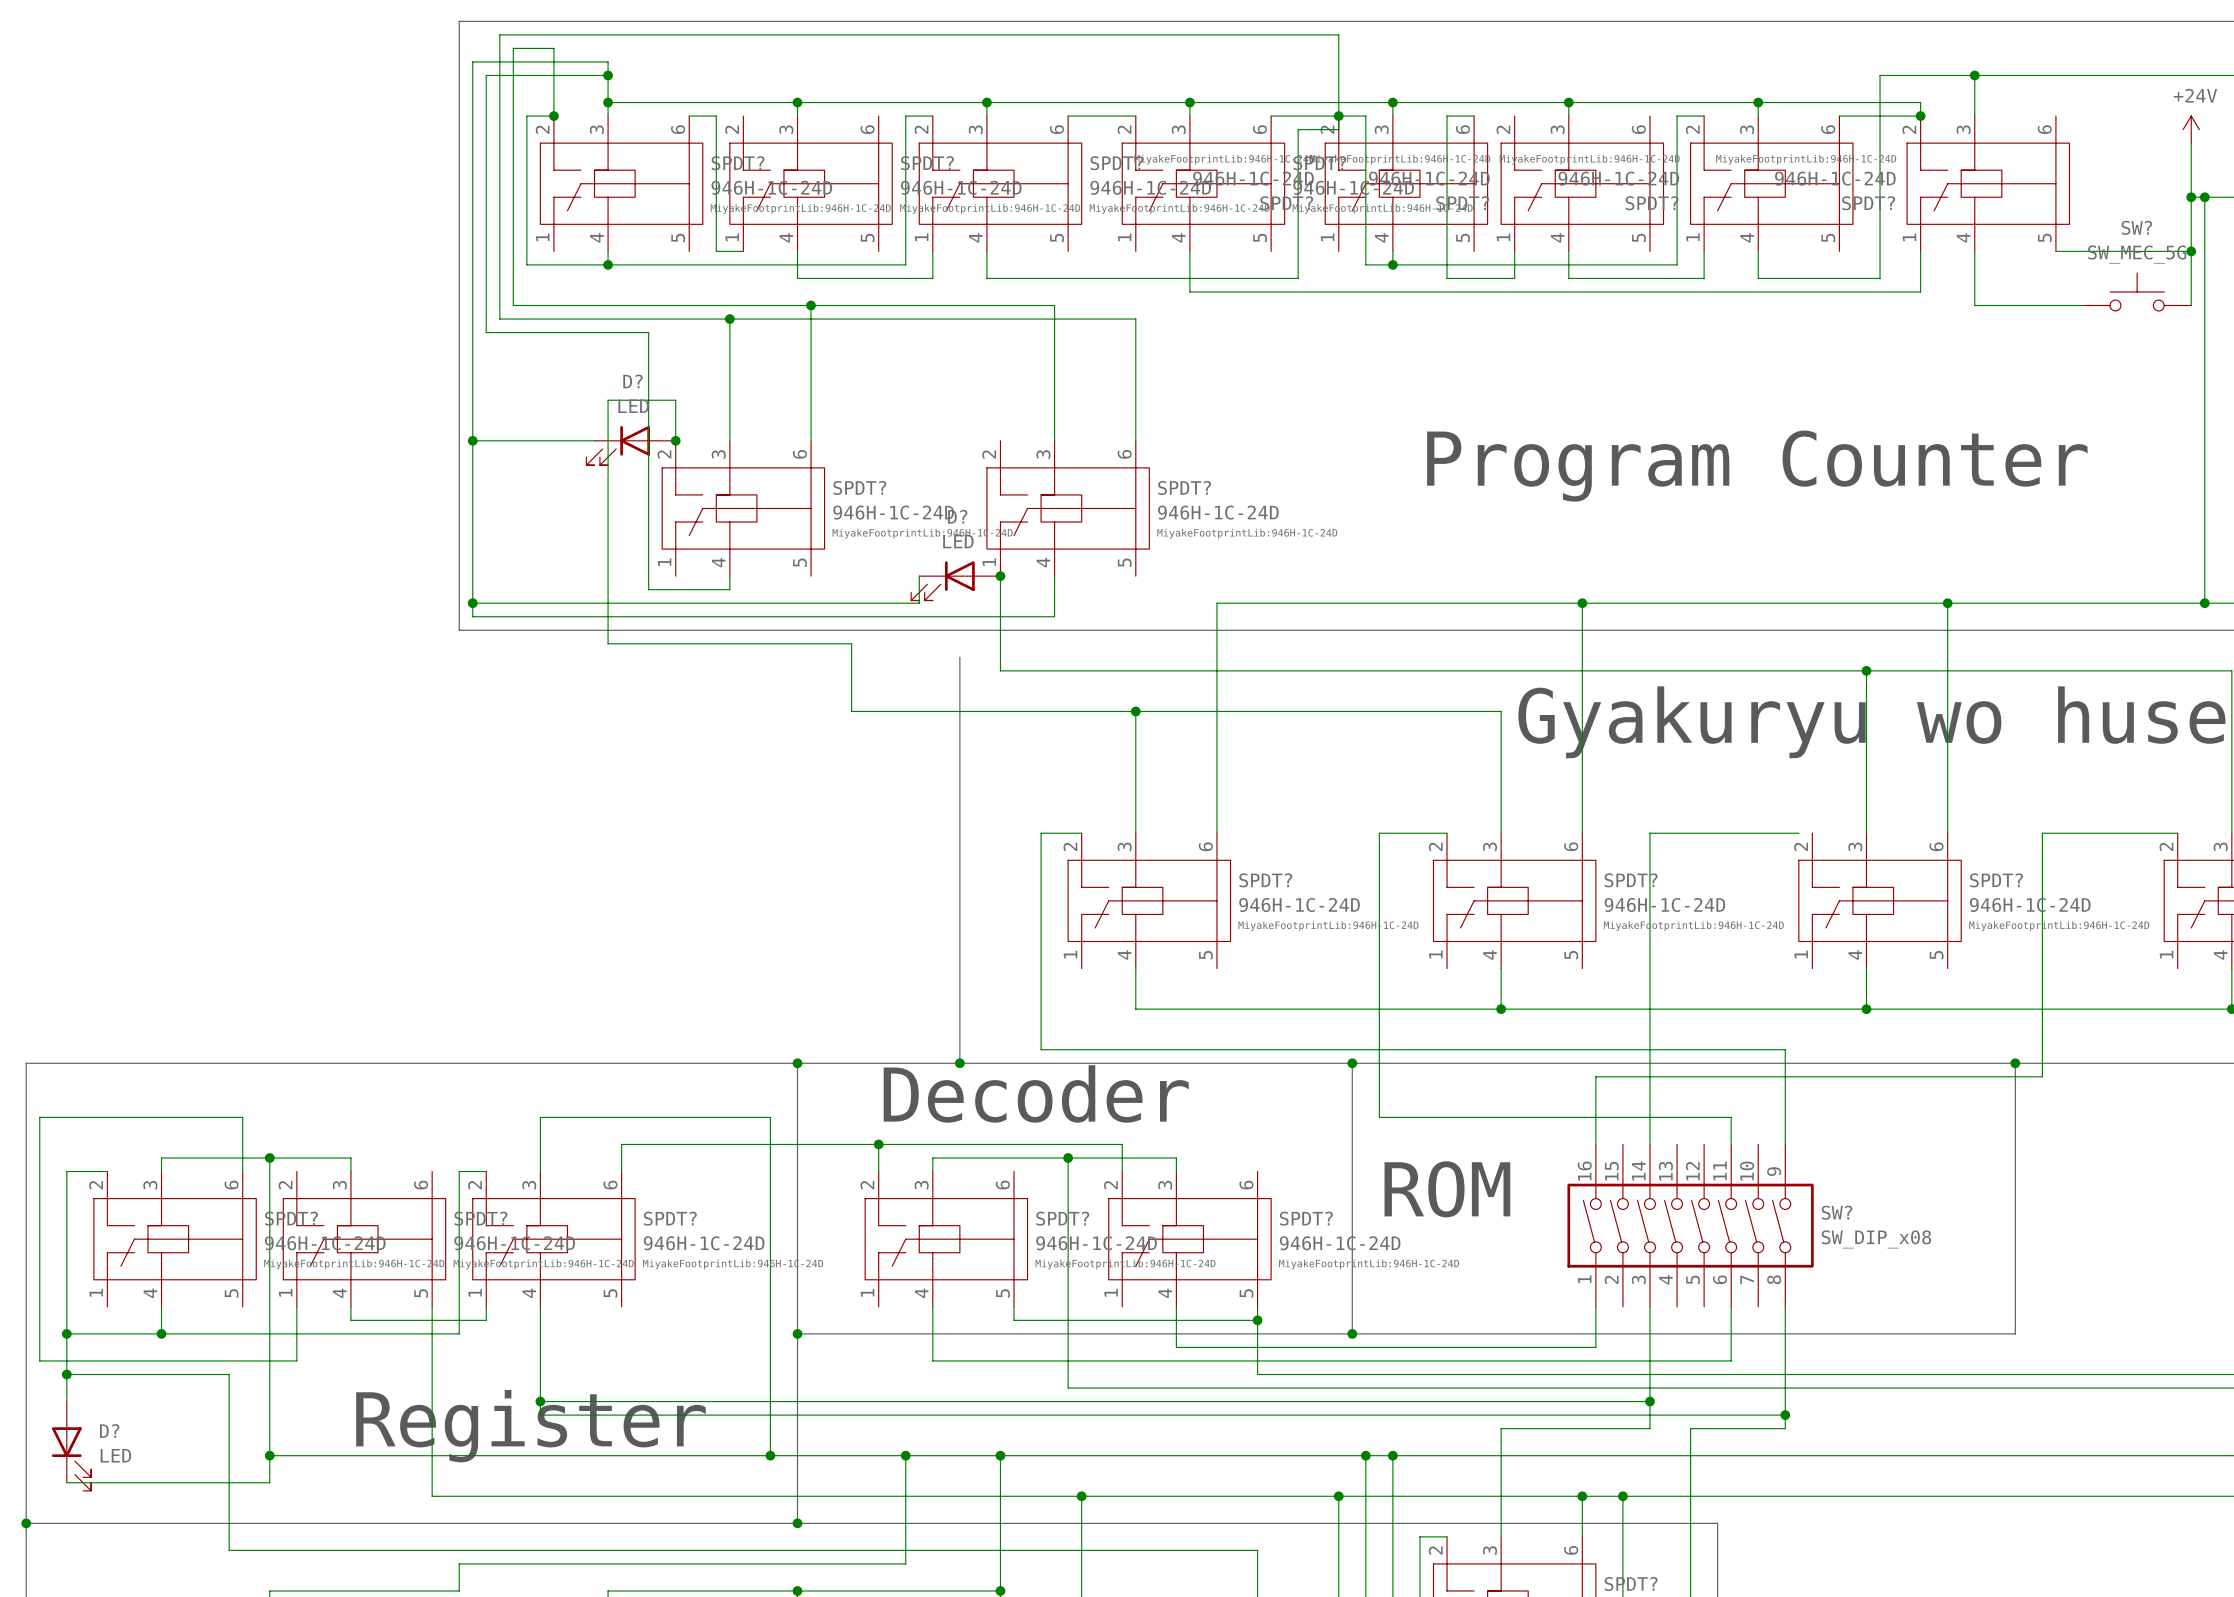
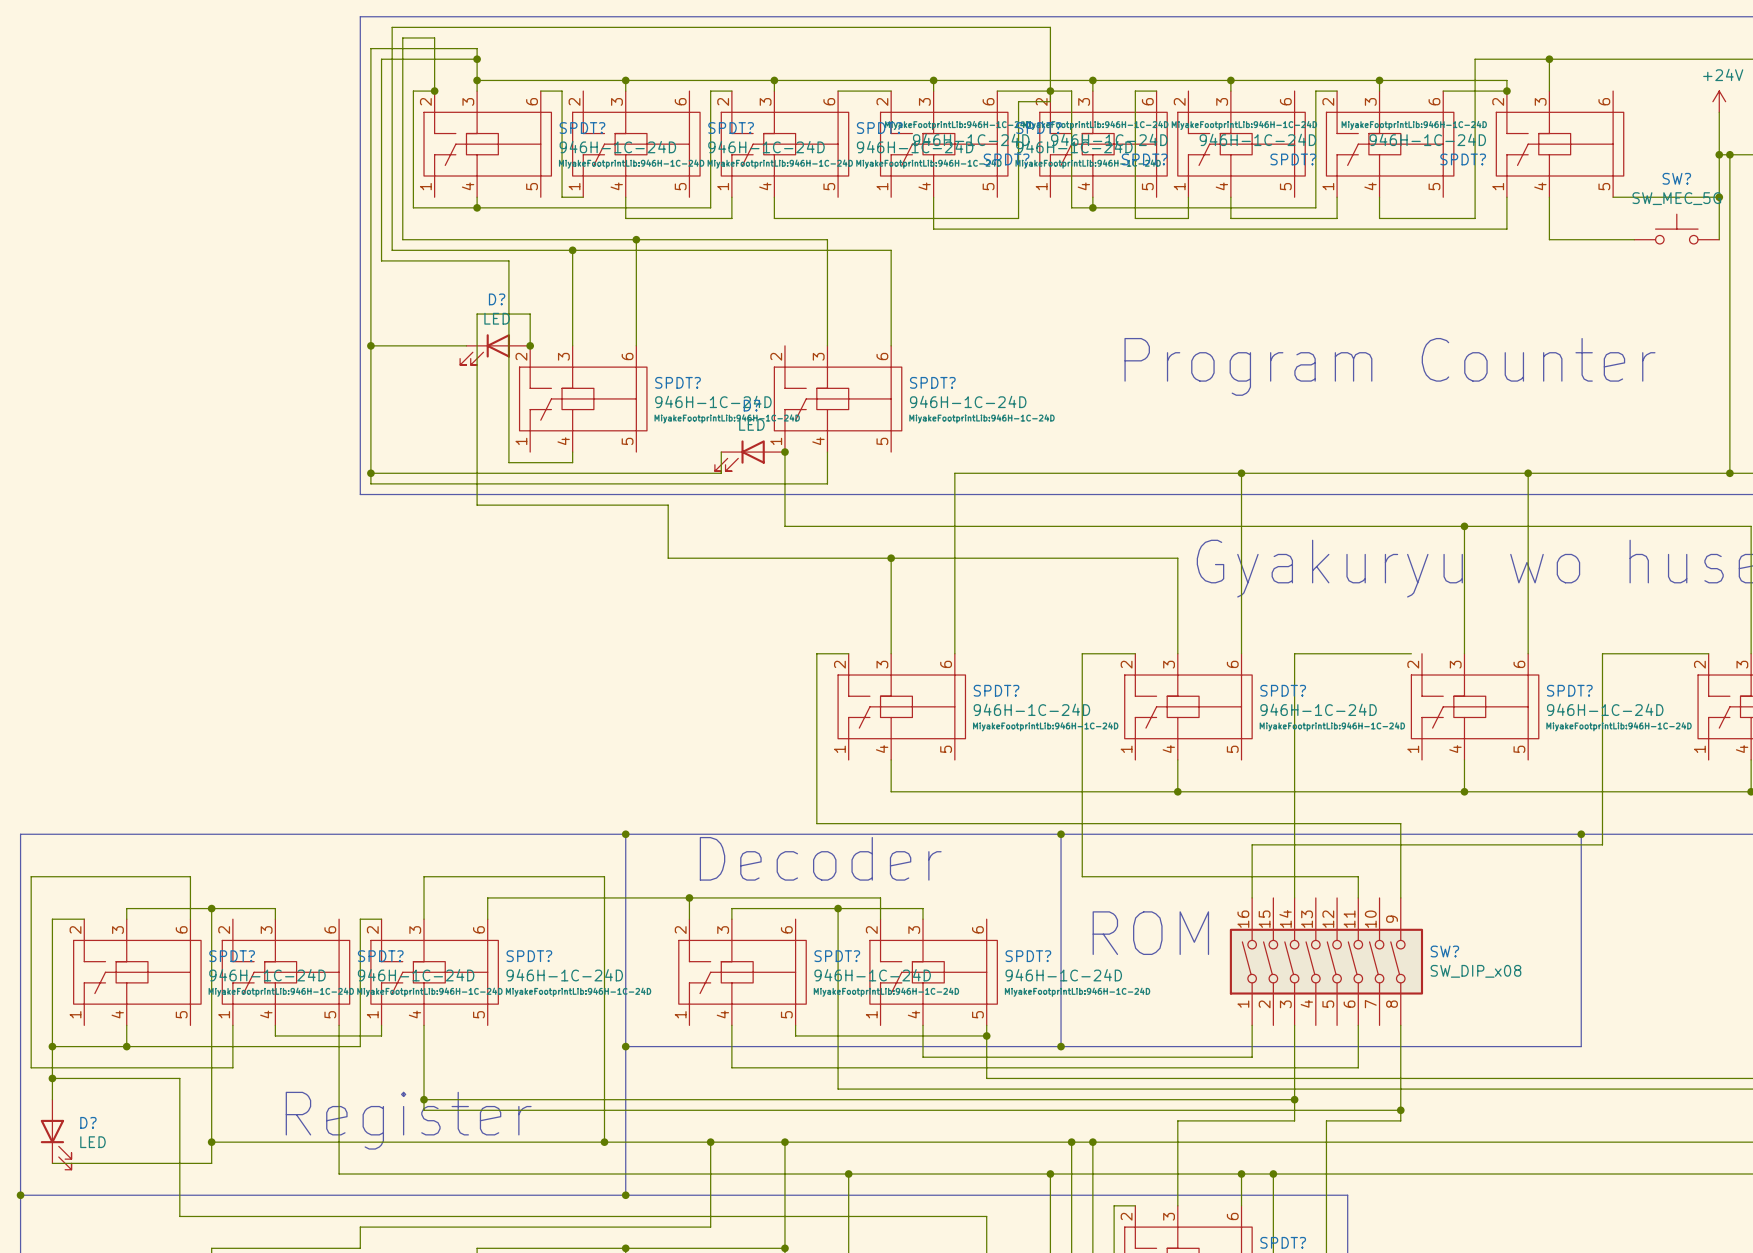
bus: (959, 657) (959, 1063) -> none
junction: (959, 1063) -> none

